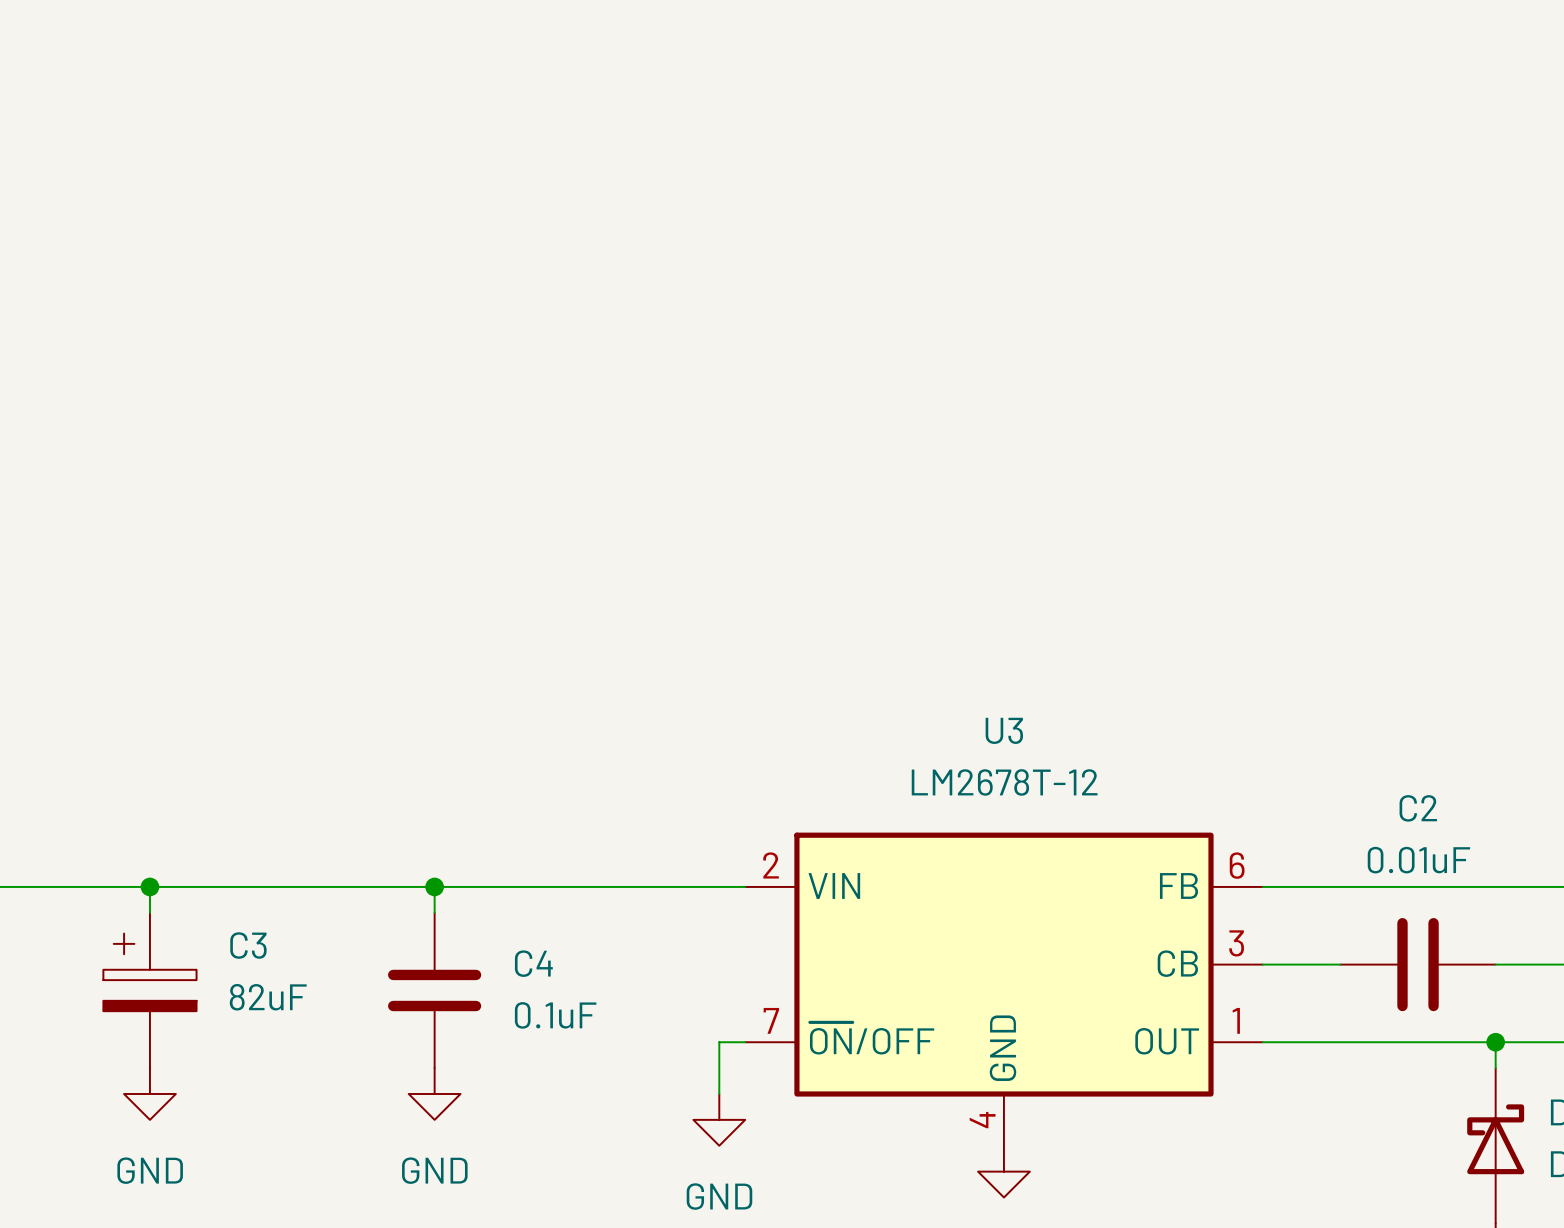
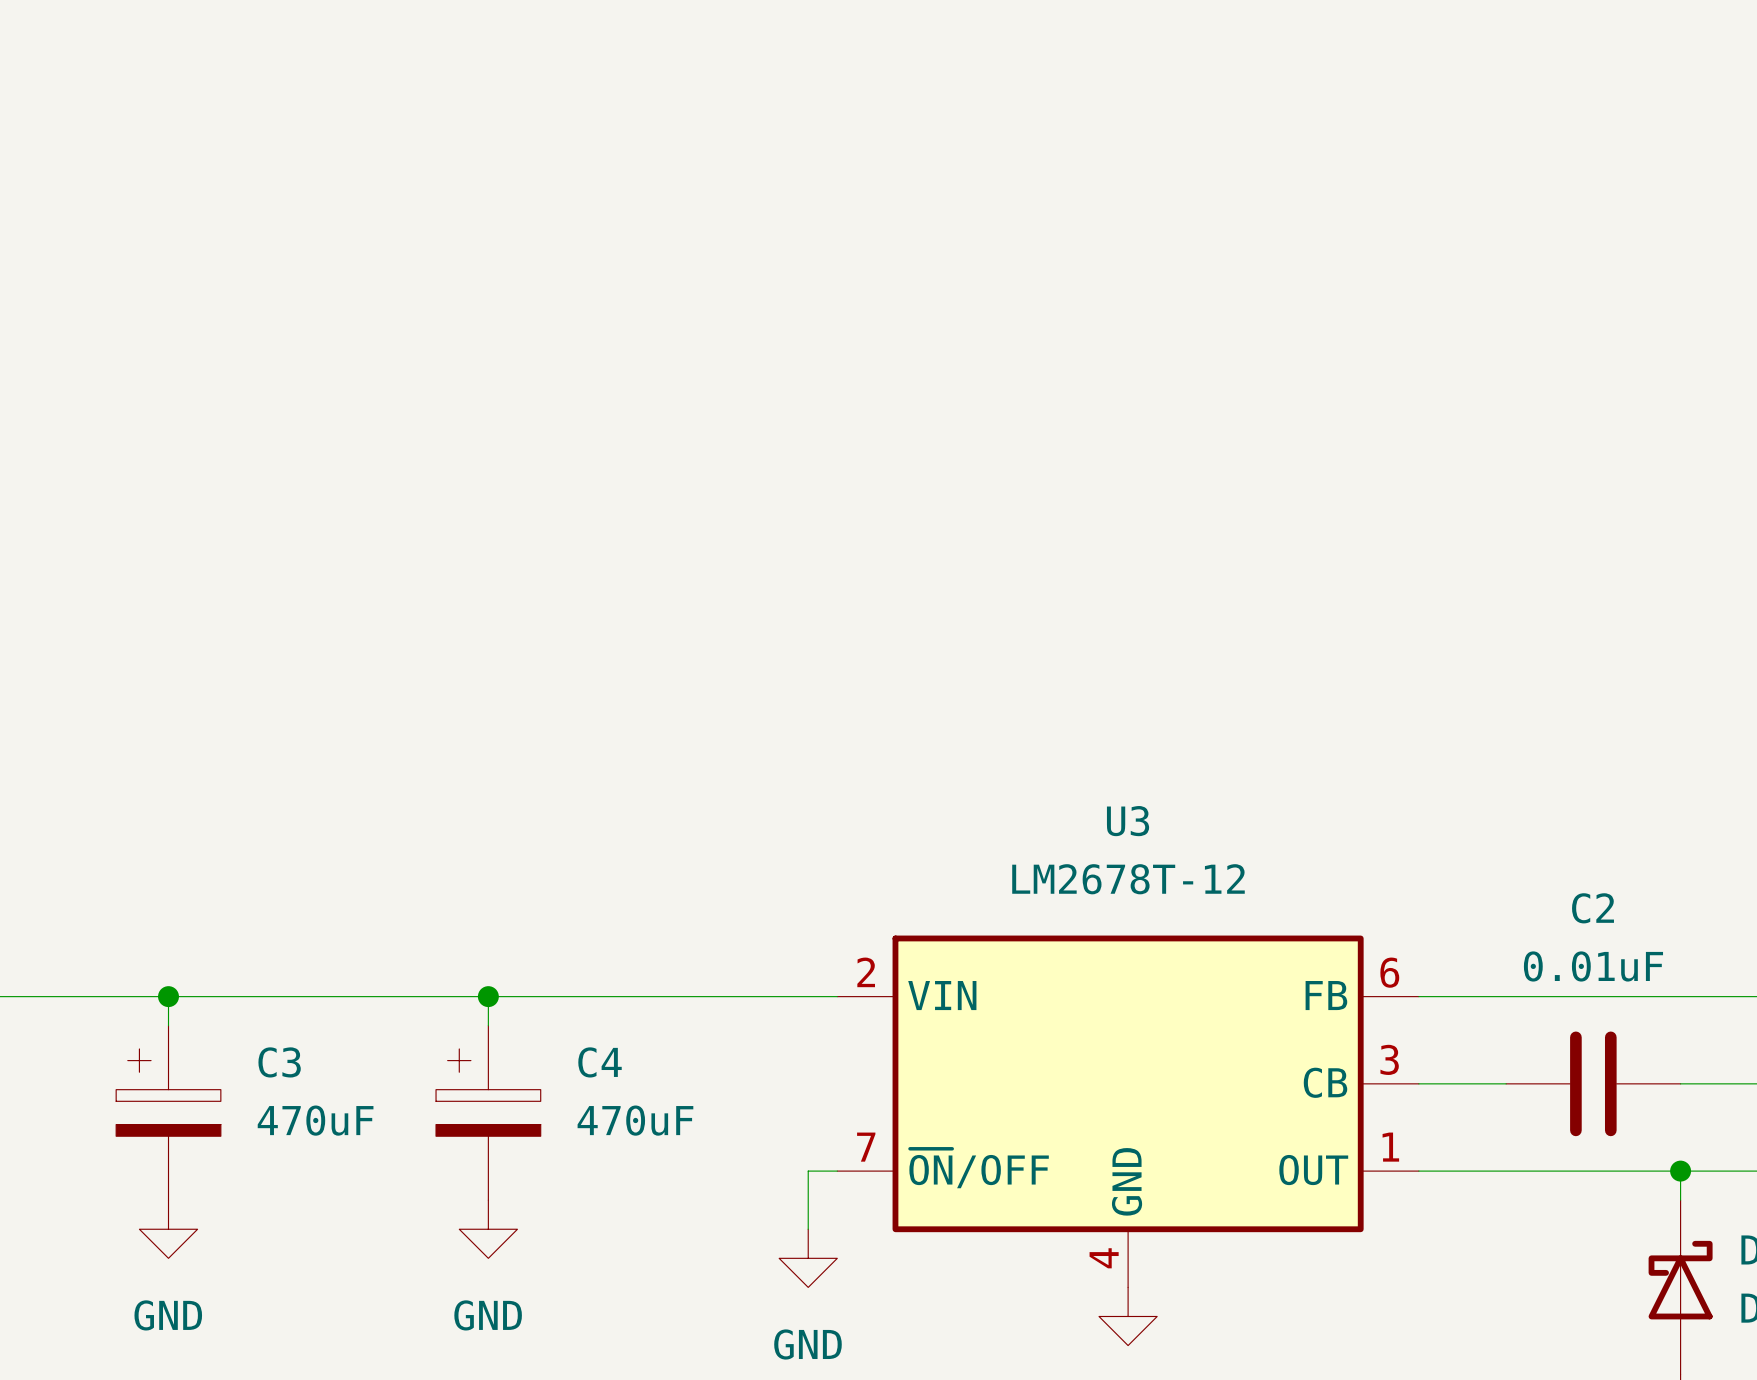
C4 symbol: [388, 912, 482, 1069] -> [436, 1025, 541, 1201]
C3 value: 82uF (268, 997) -> 470uF (315, 1120)
C4 value: 0.1uF (555, 1015) -> 470uF (635, 1120)

